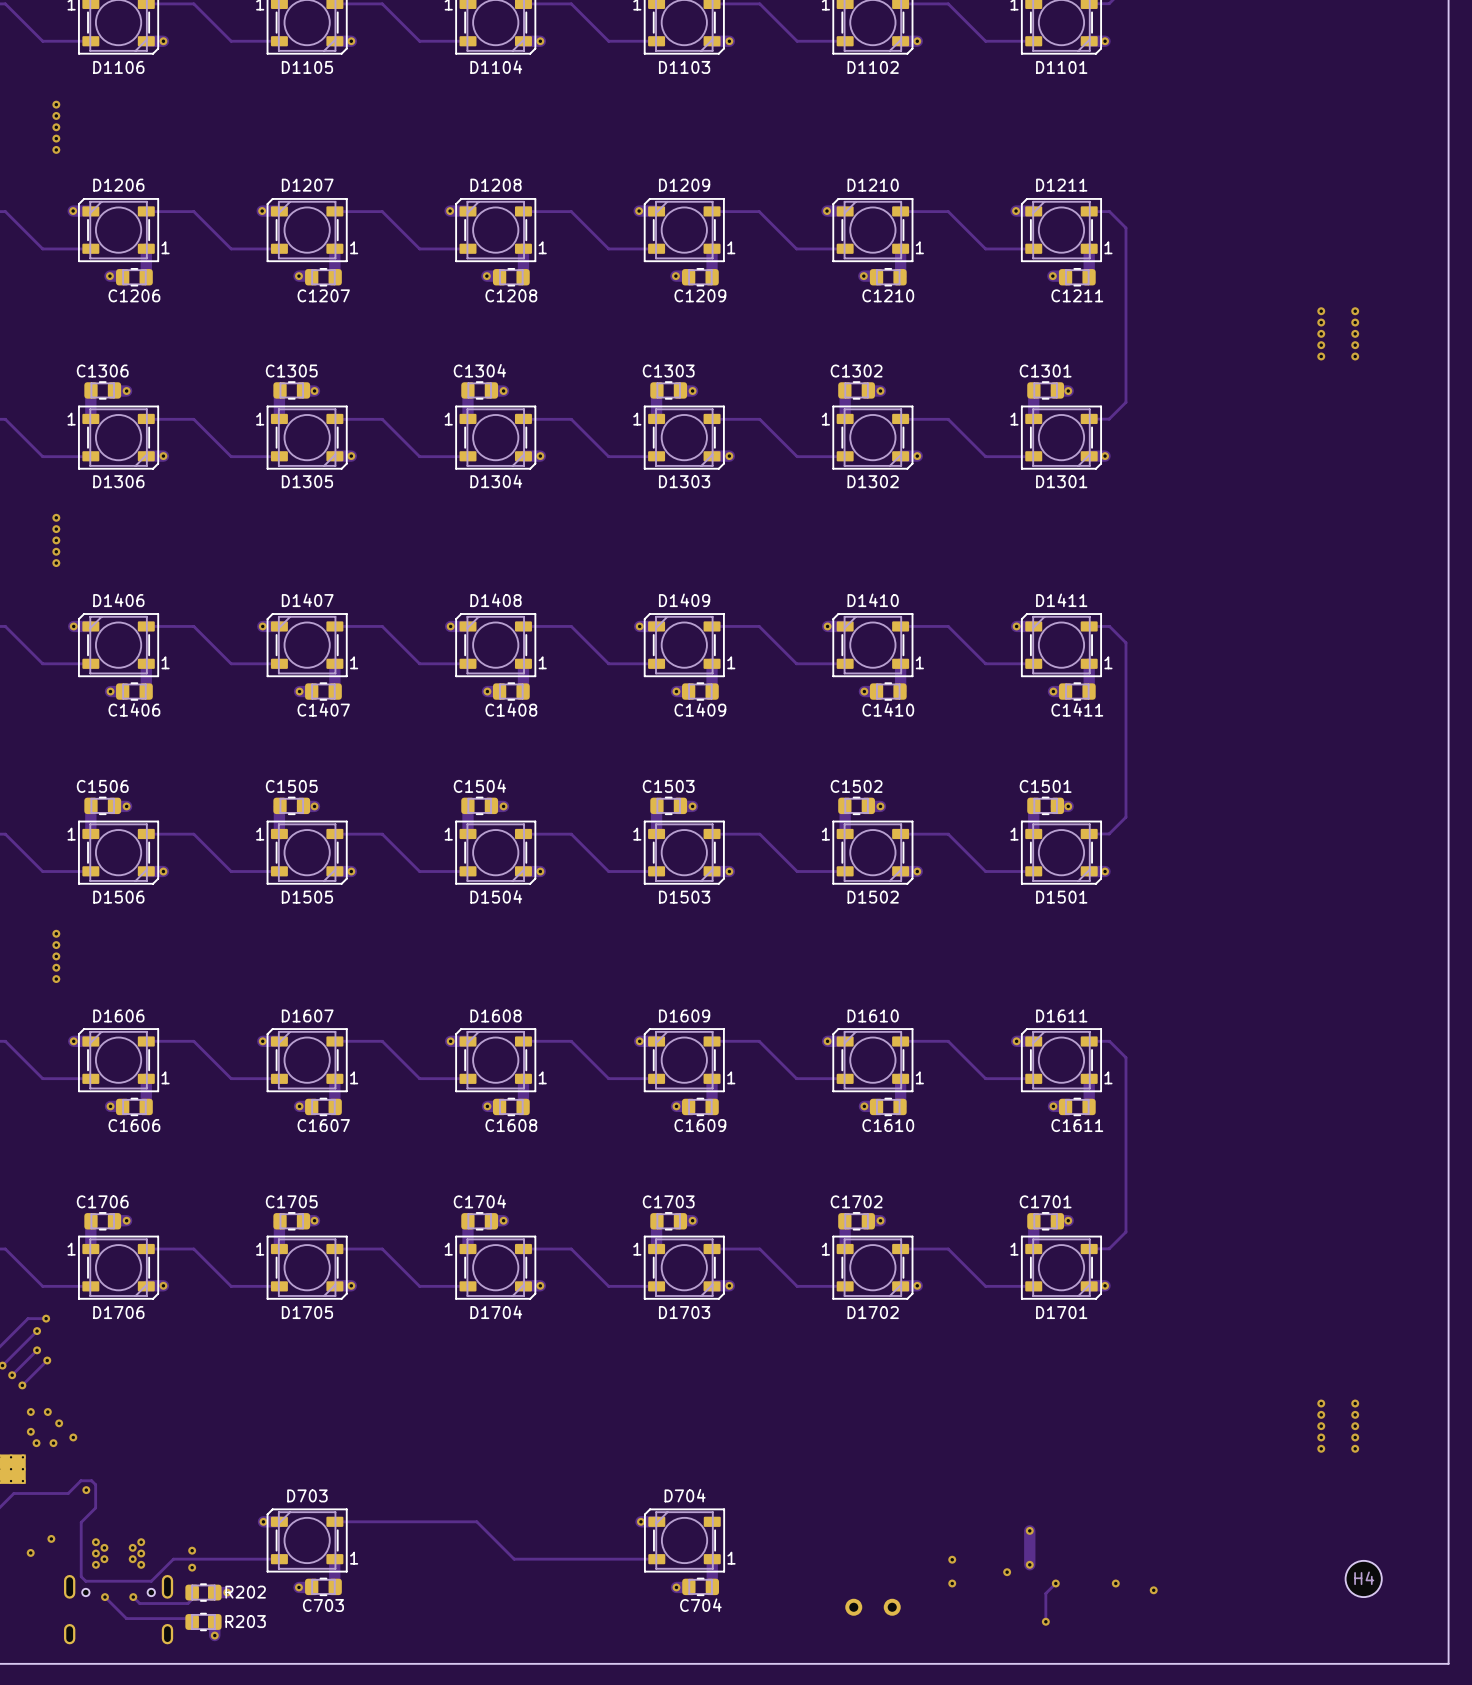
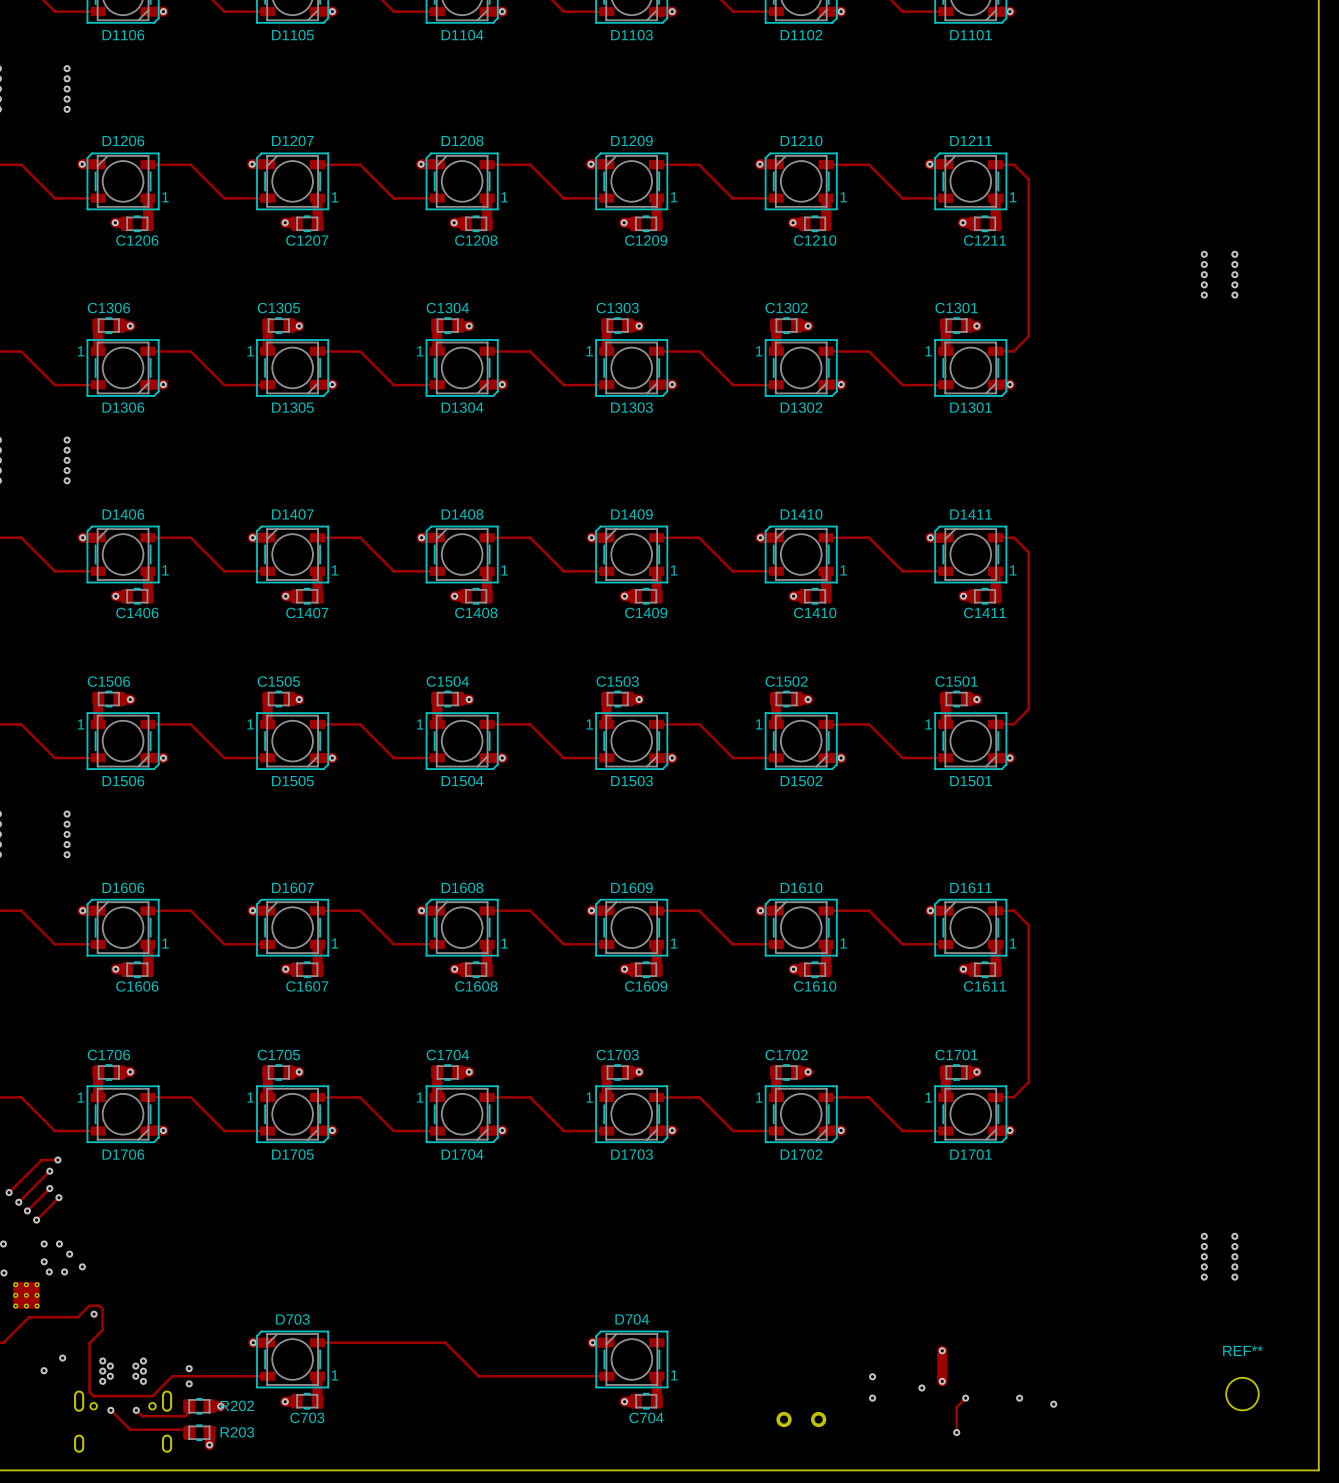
H4 name: H4 (1364, 1578) -> REF** (1242, 1350)

